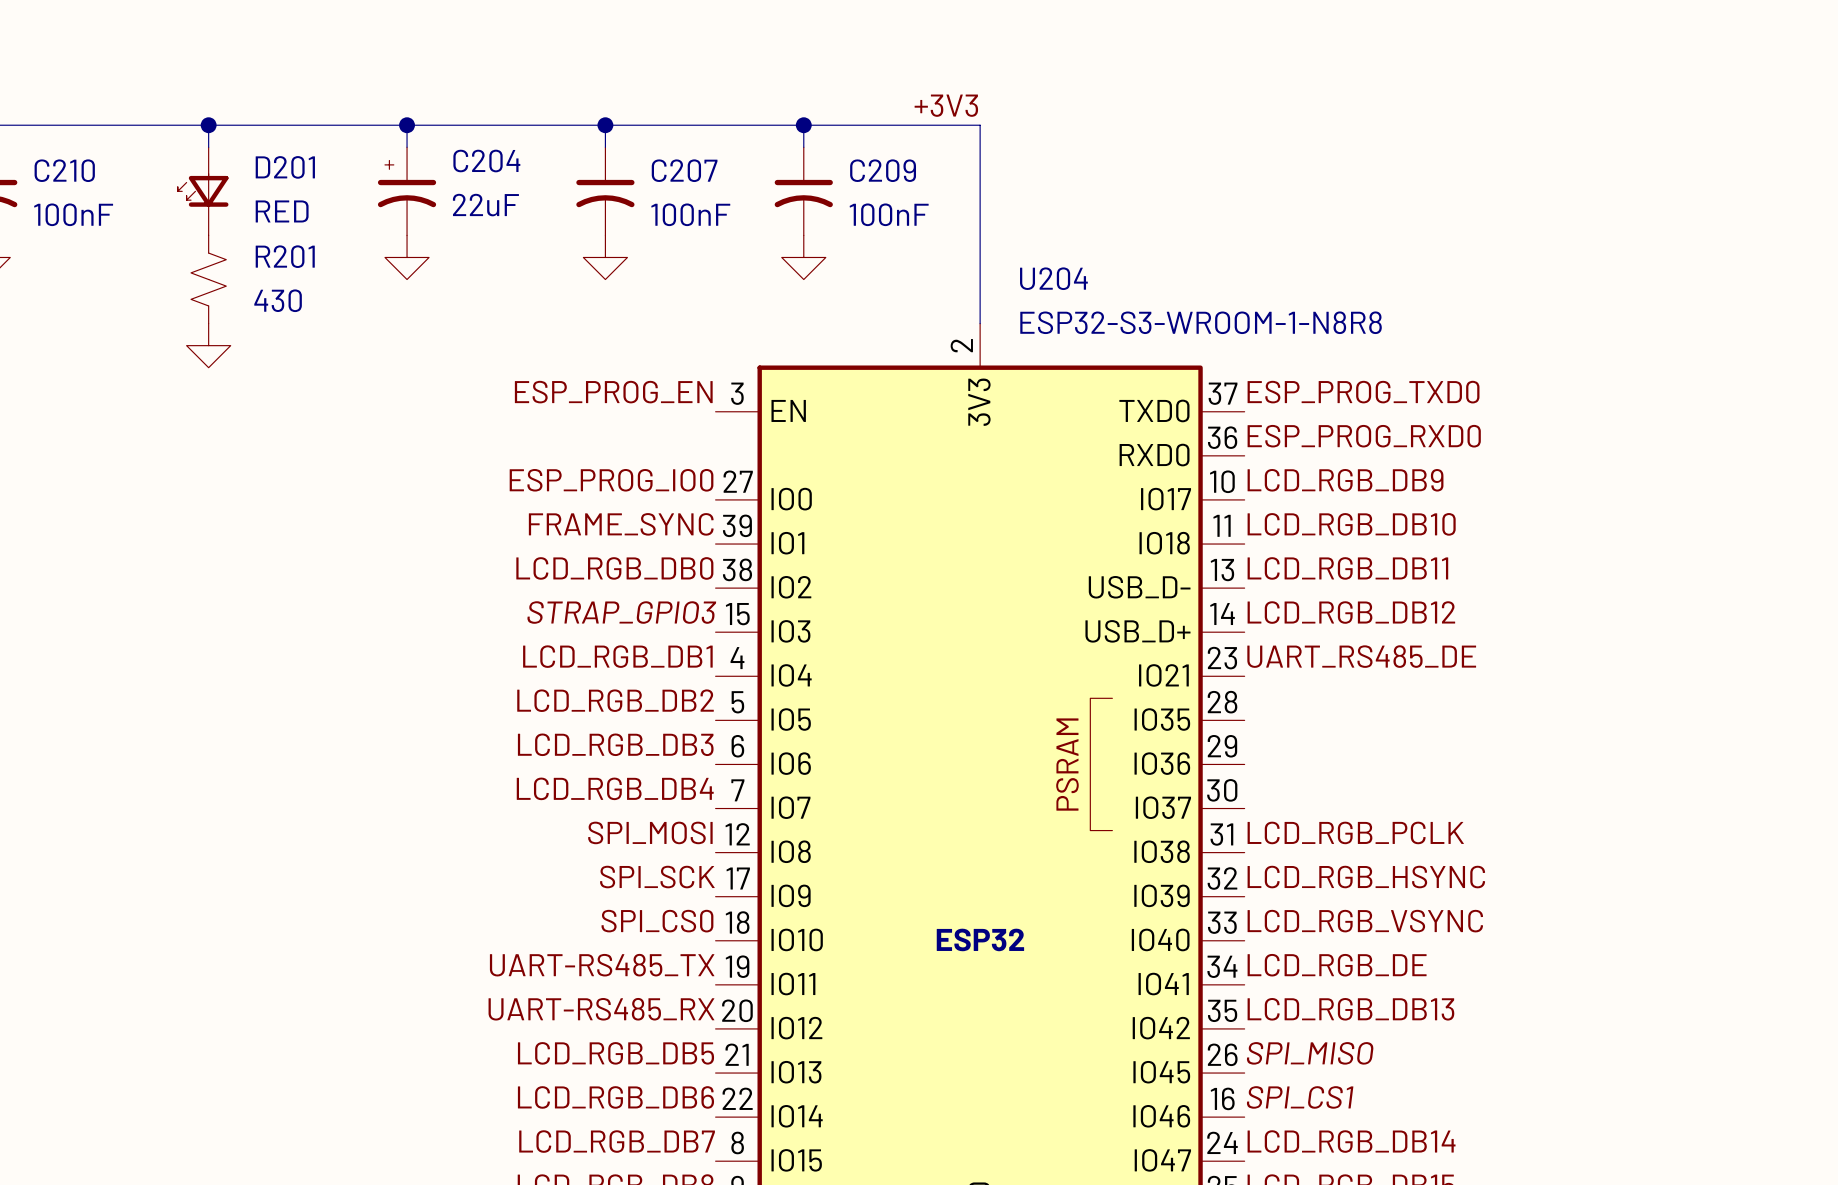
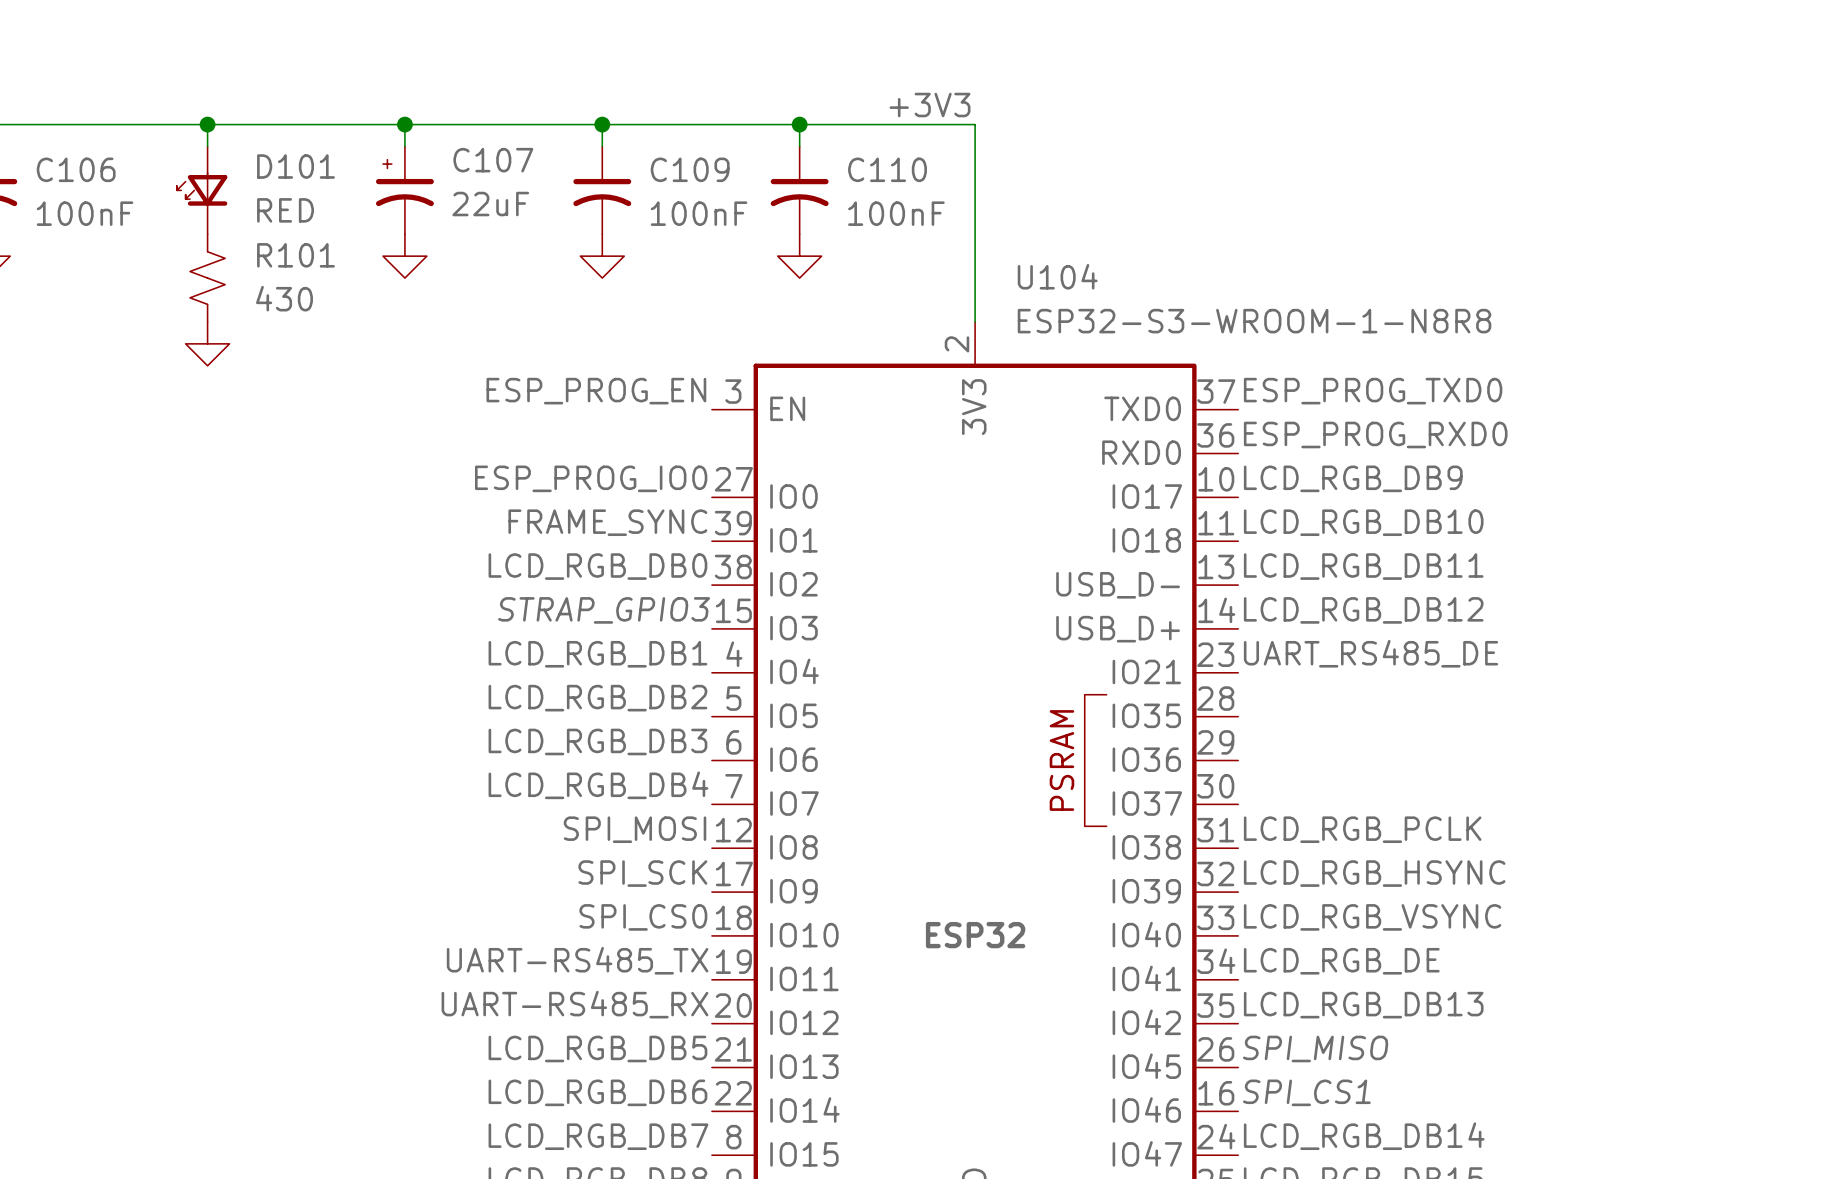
C204 name: C204 (486, 161) -> C107 (493, 160)
D201 name: D201 (285, 167) -> D101 (295, 166)
C210 name: C210 (64, 170) -> C106 (76, 169)
C207 name: C207 (684, 170) -> C109 (690, 169)
C209 name: C209 (883, 170) -> C110 (887, 169)
R201 name: R201 (285, 256) -> R101 (295, 255)
U204 name: U204 (1053, 278) -> U104 (1057, 276)

